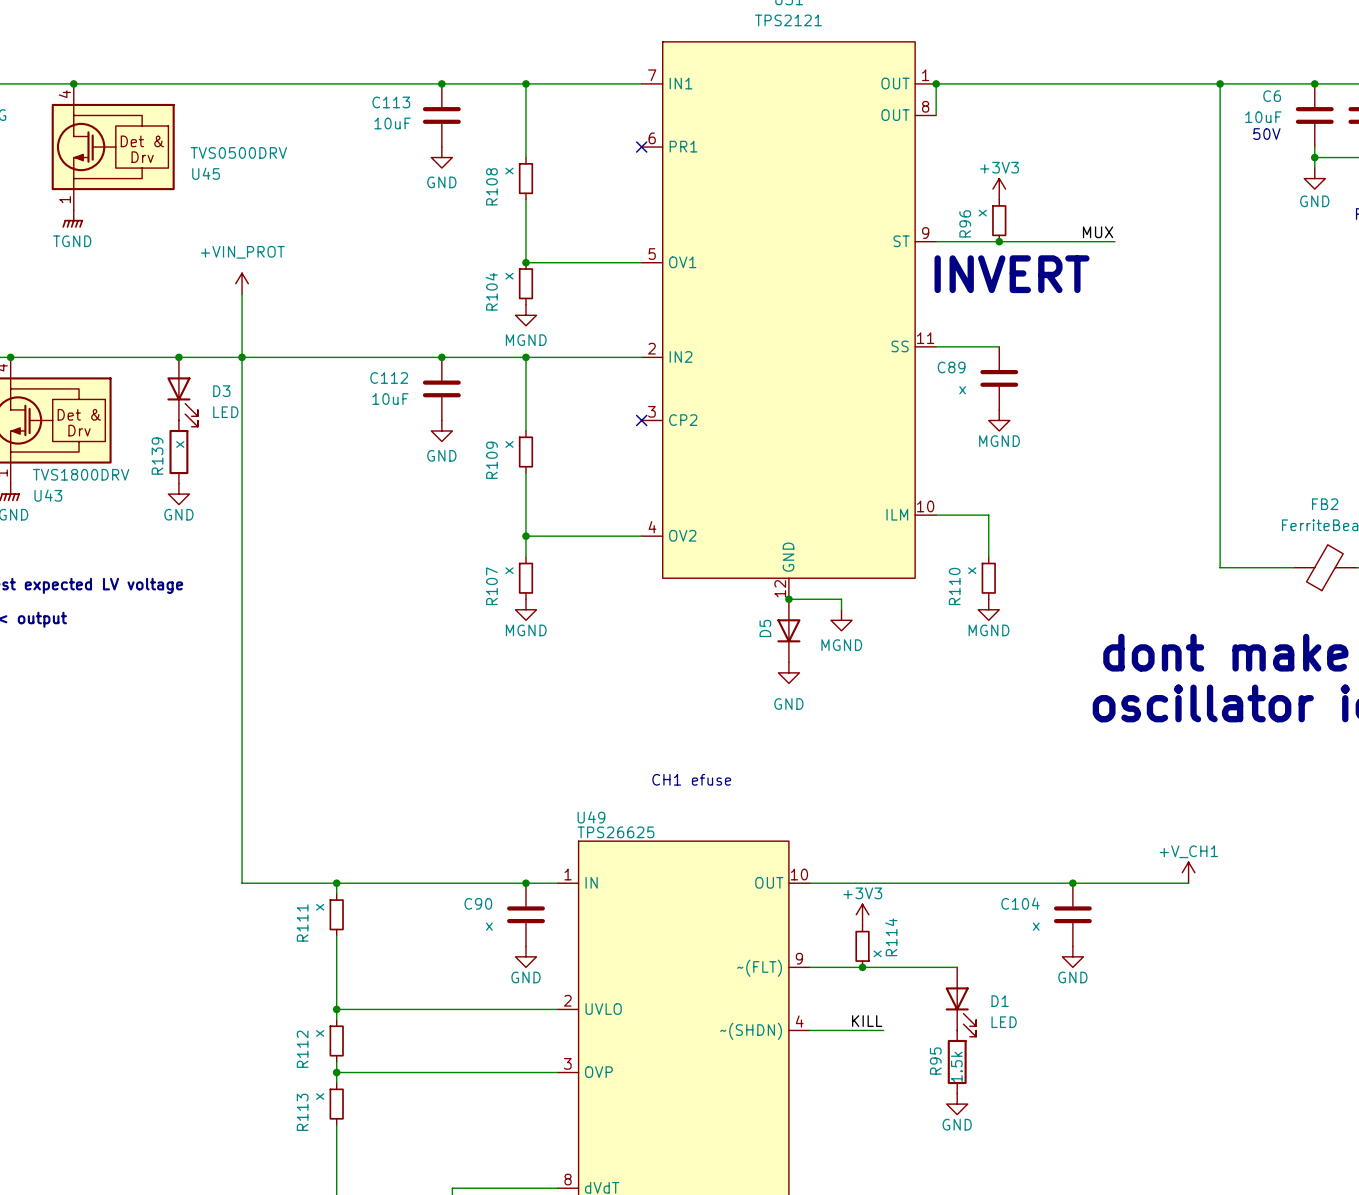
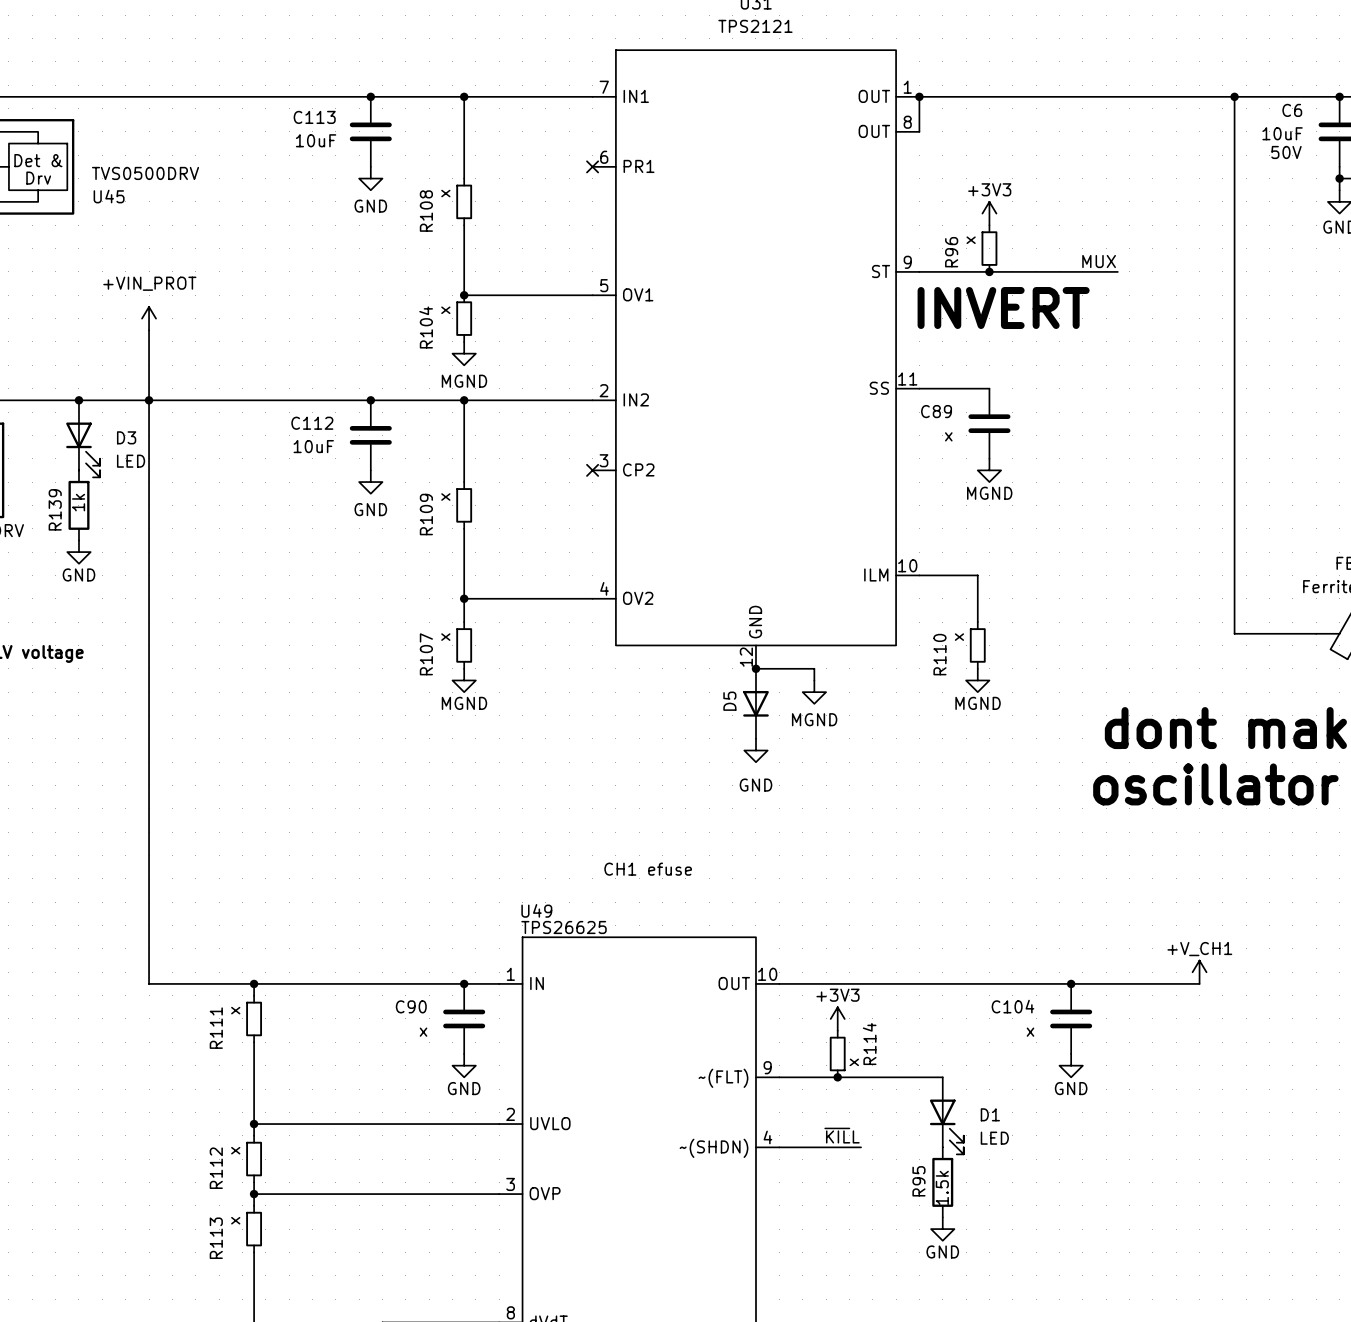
R139 value: x (180, 444) -> 1k (78, 502)
label: KILL (867, 1021) -> ~{KIL}L (842, 1135)

